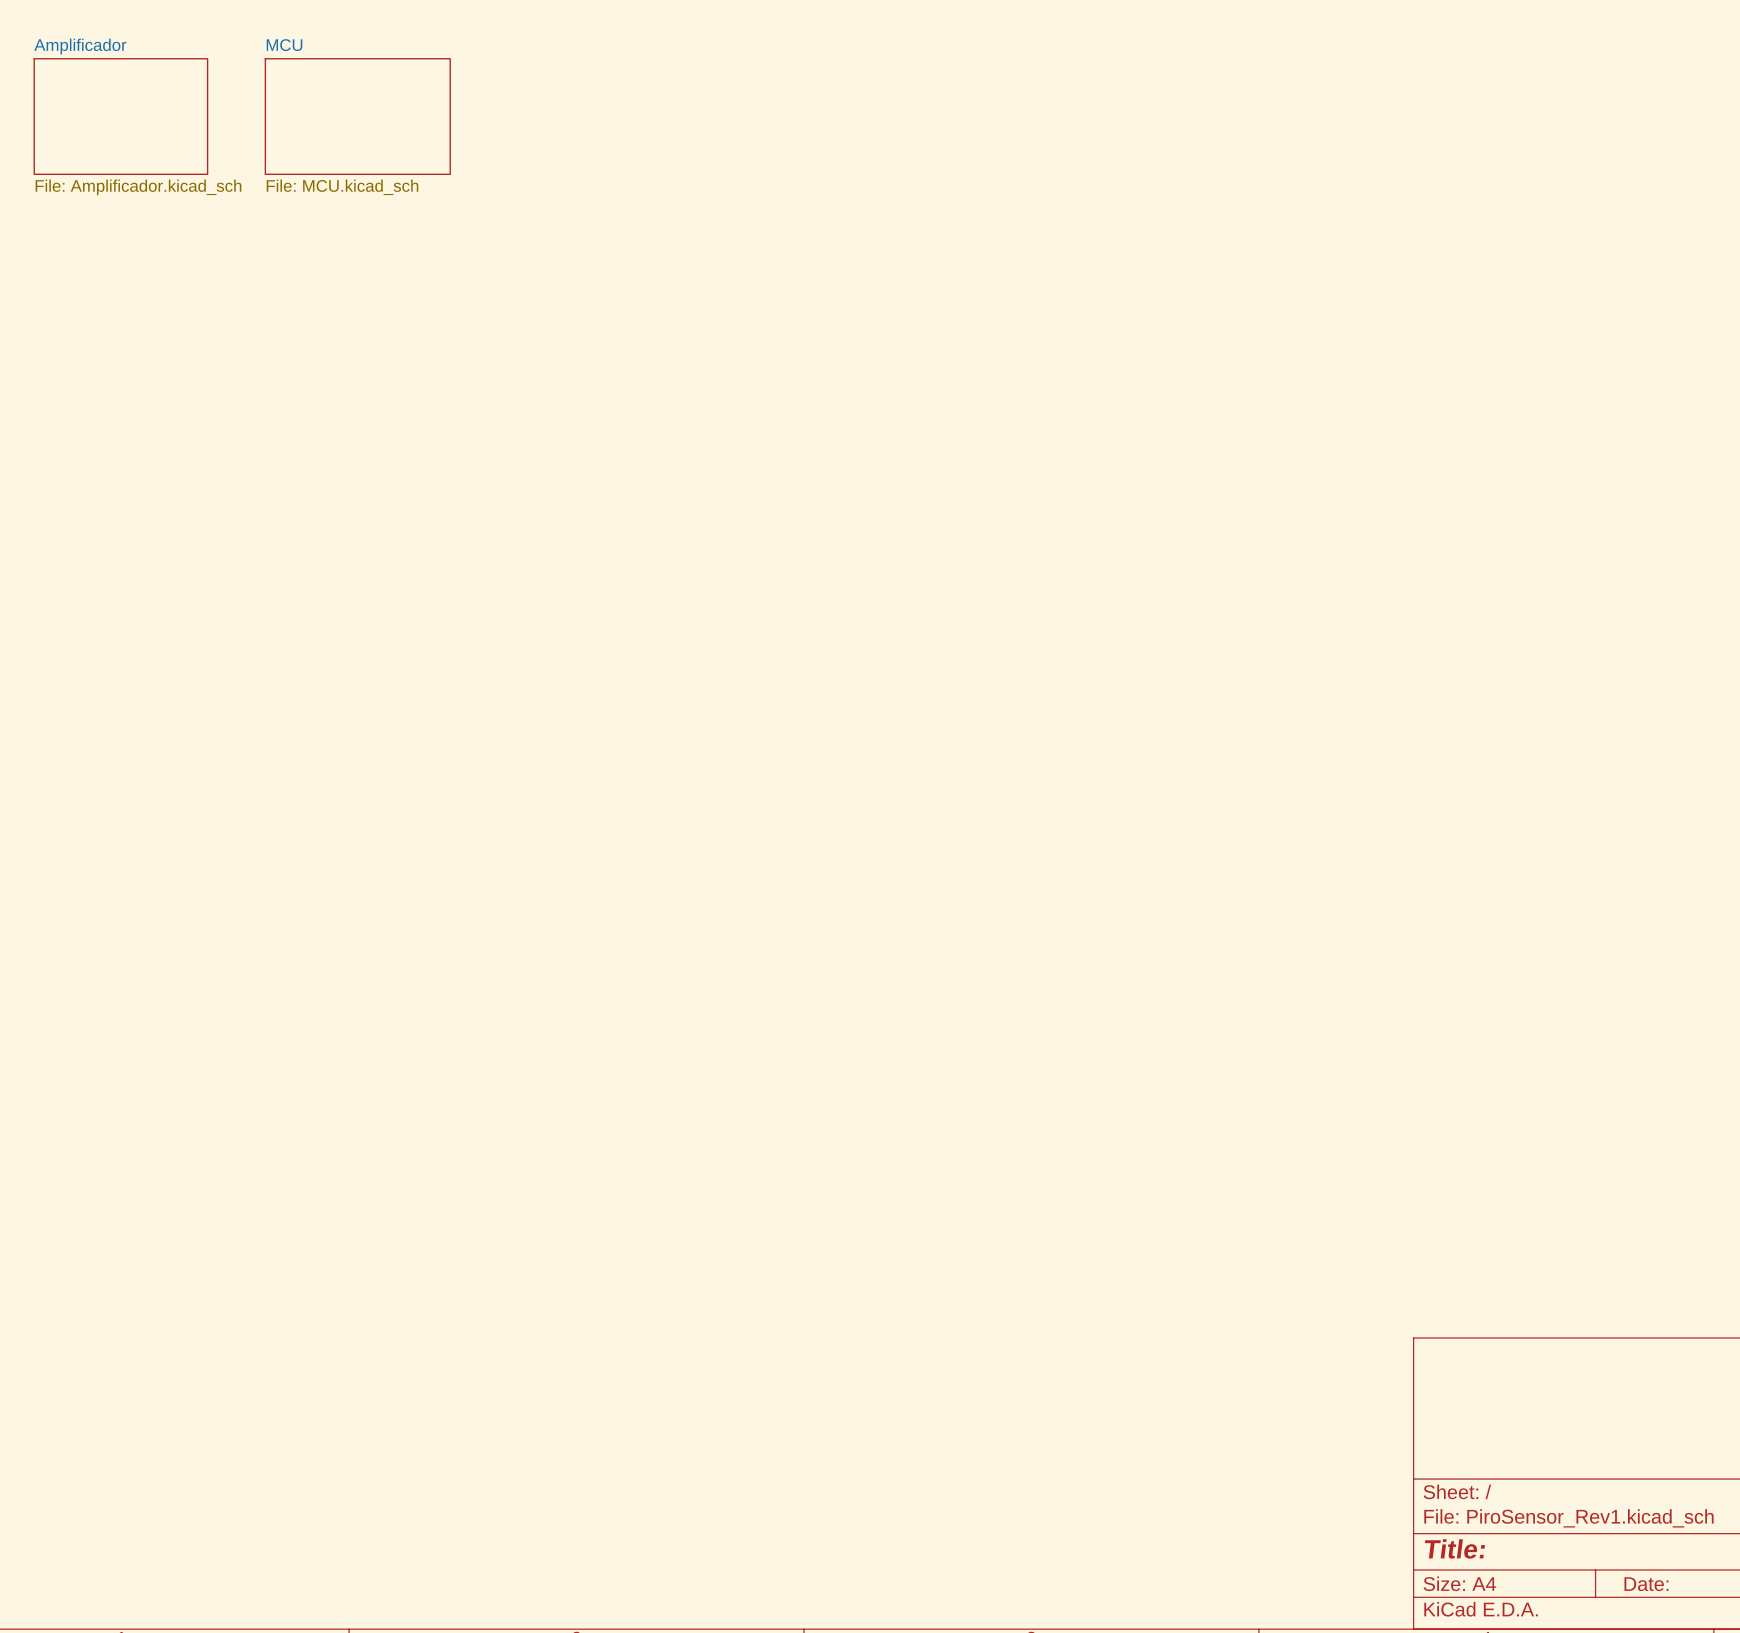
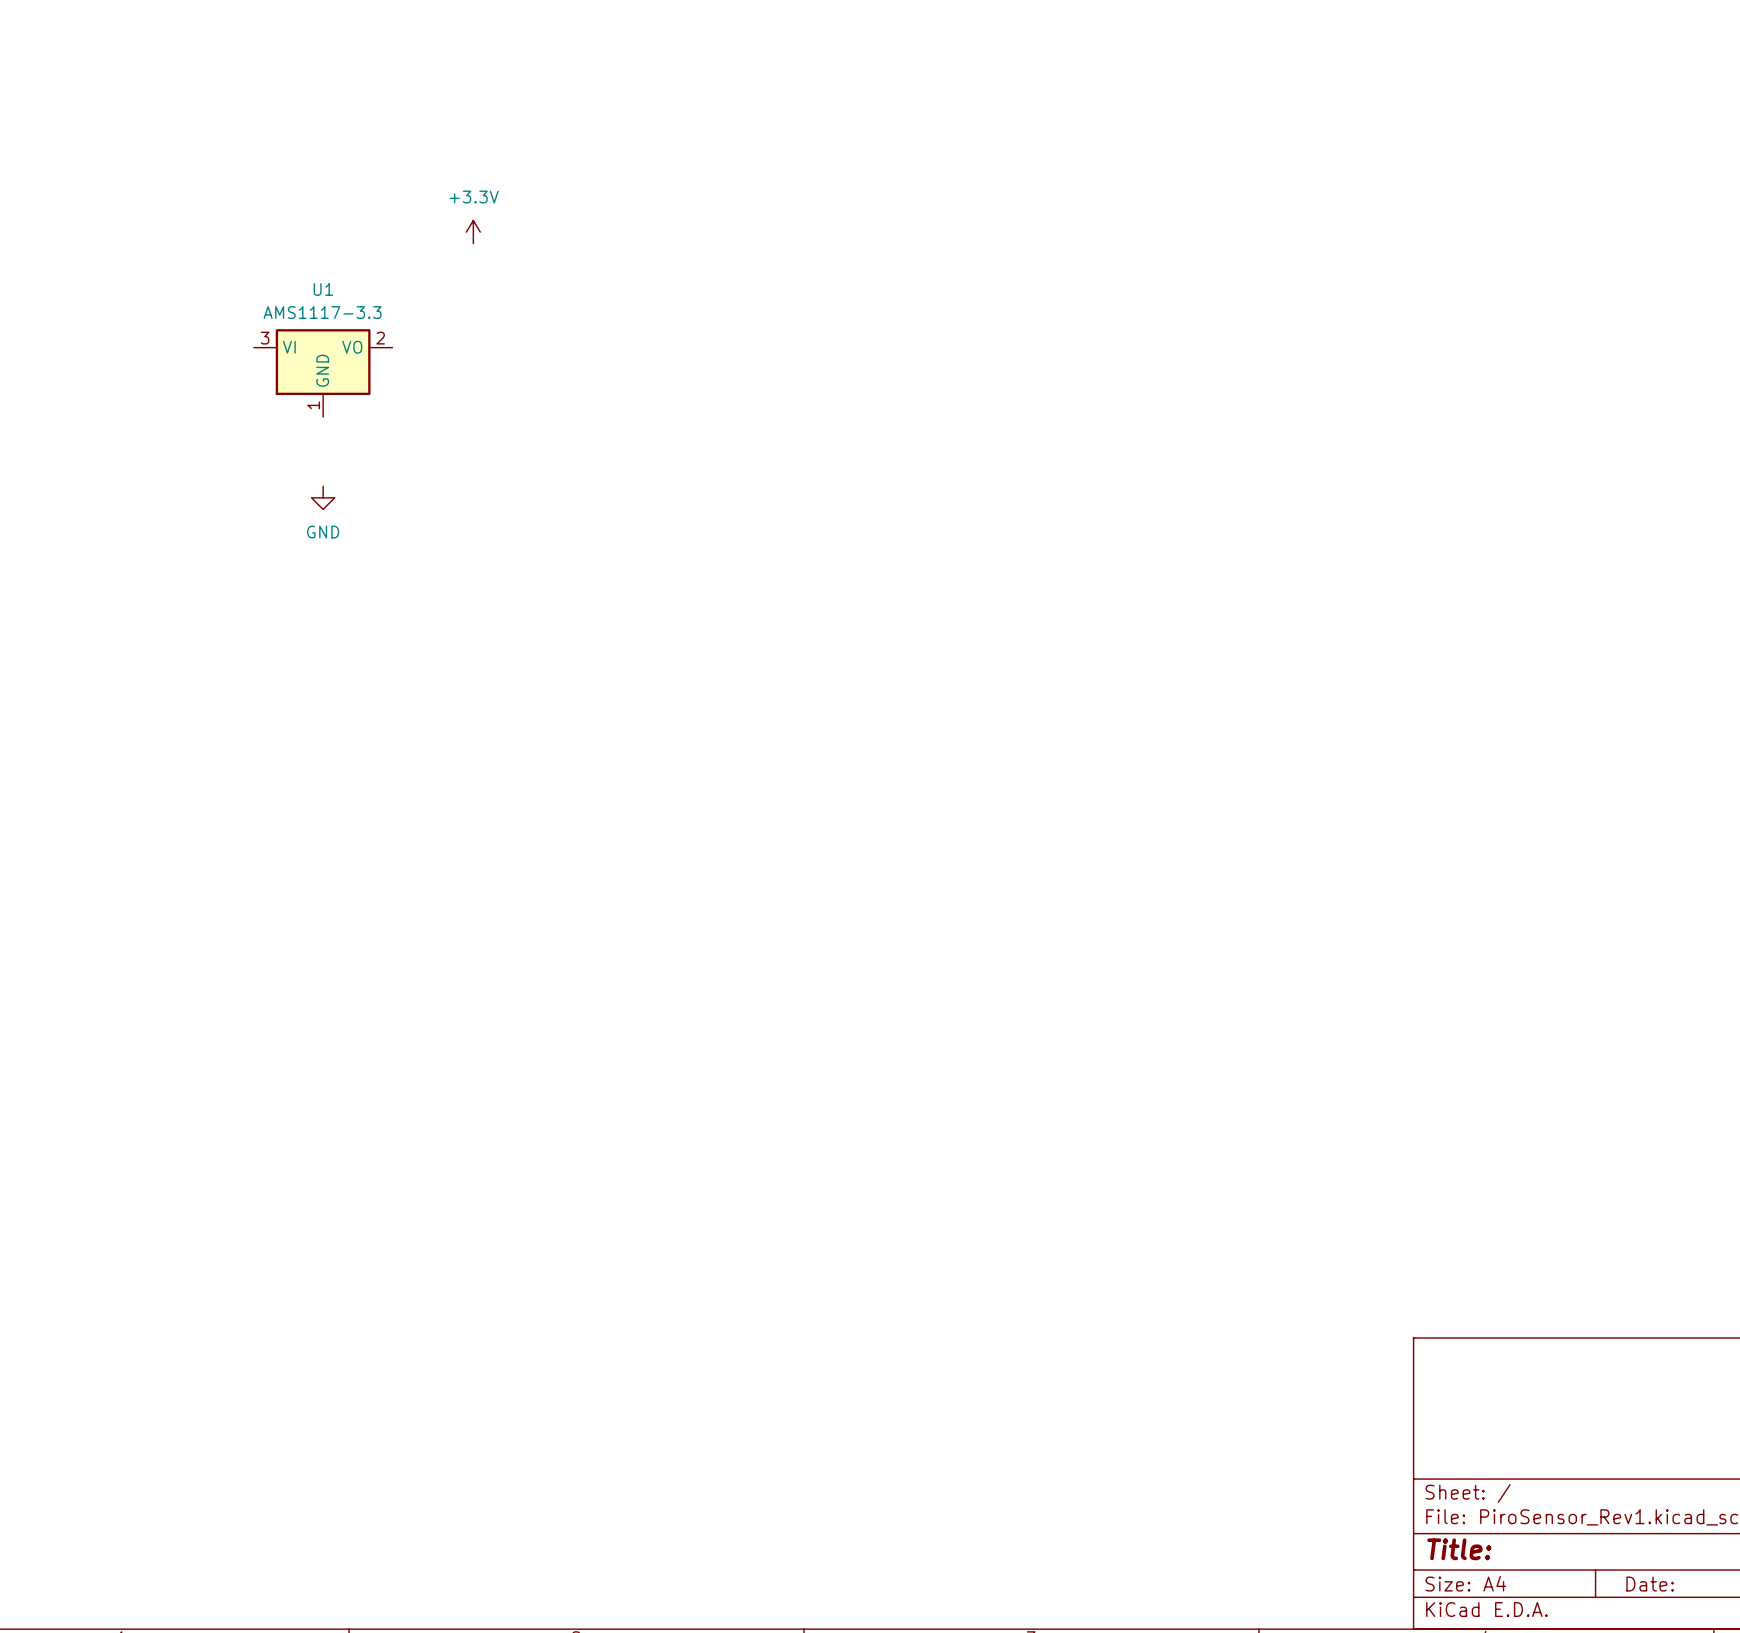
sheet Amplificador: File: Amplificador.kicad_sch (120, 116) -> none
sheet MCU: File: MCU.kicad_sch (357, 116) -> none
power symbol: none -> +3.3V (473, 232)
U1: none -> AMS1117-3.3 (323, 373)
power symbol: none -> GND (323, 497)

